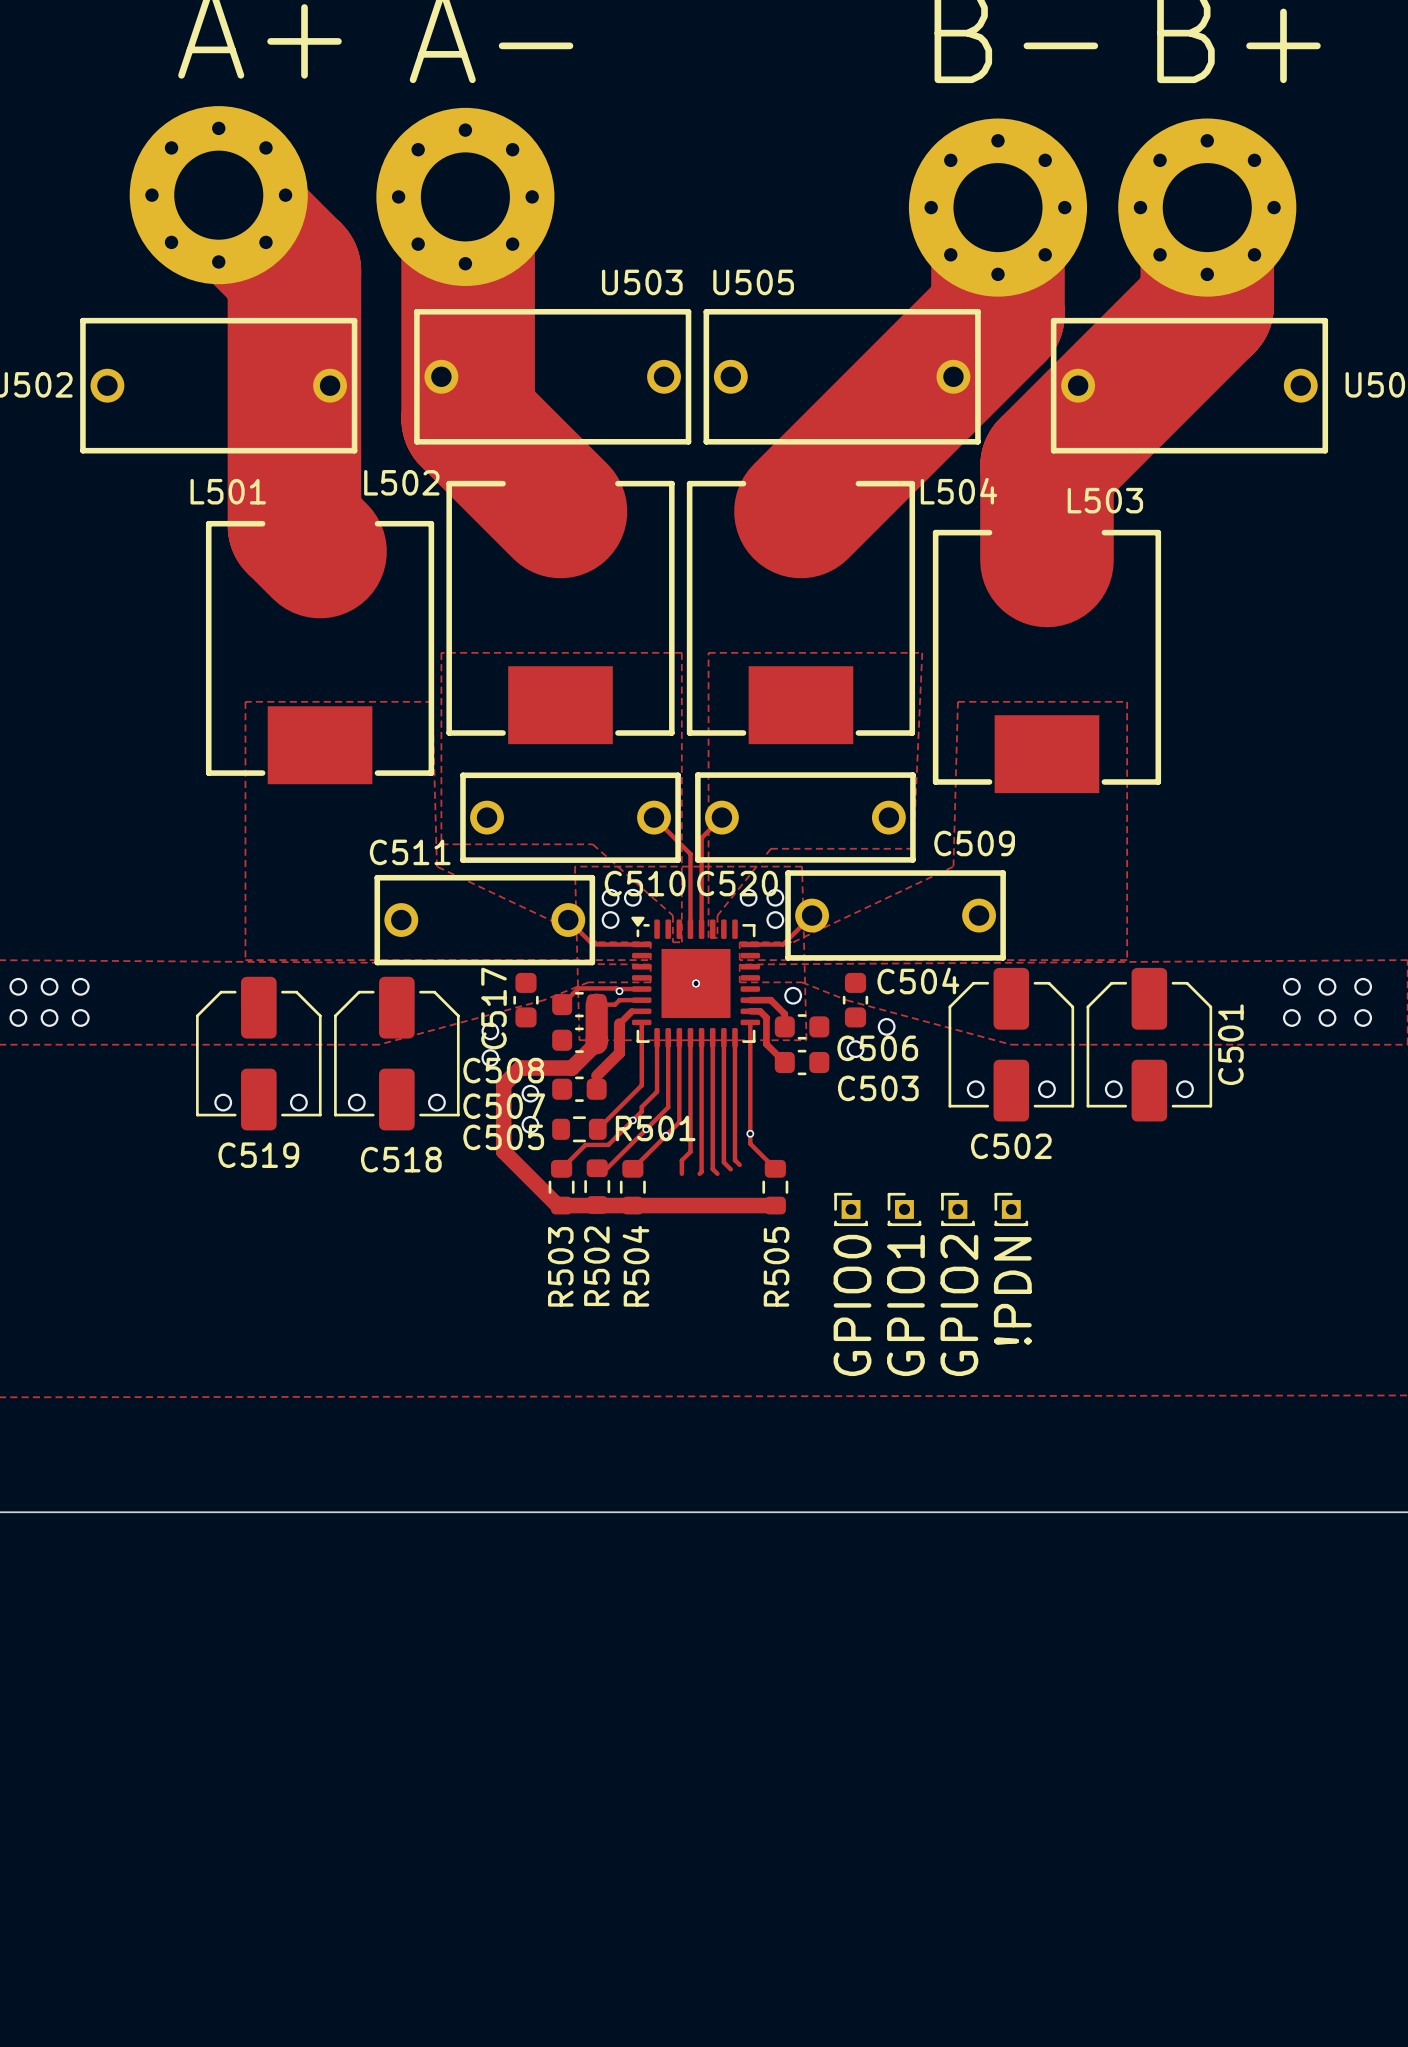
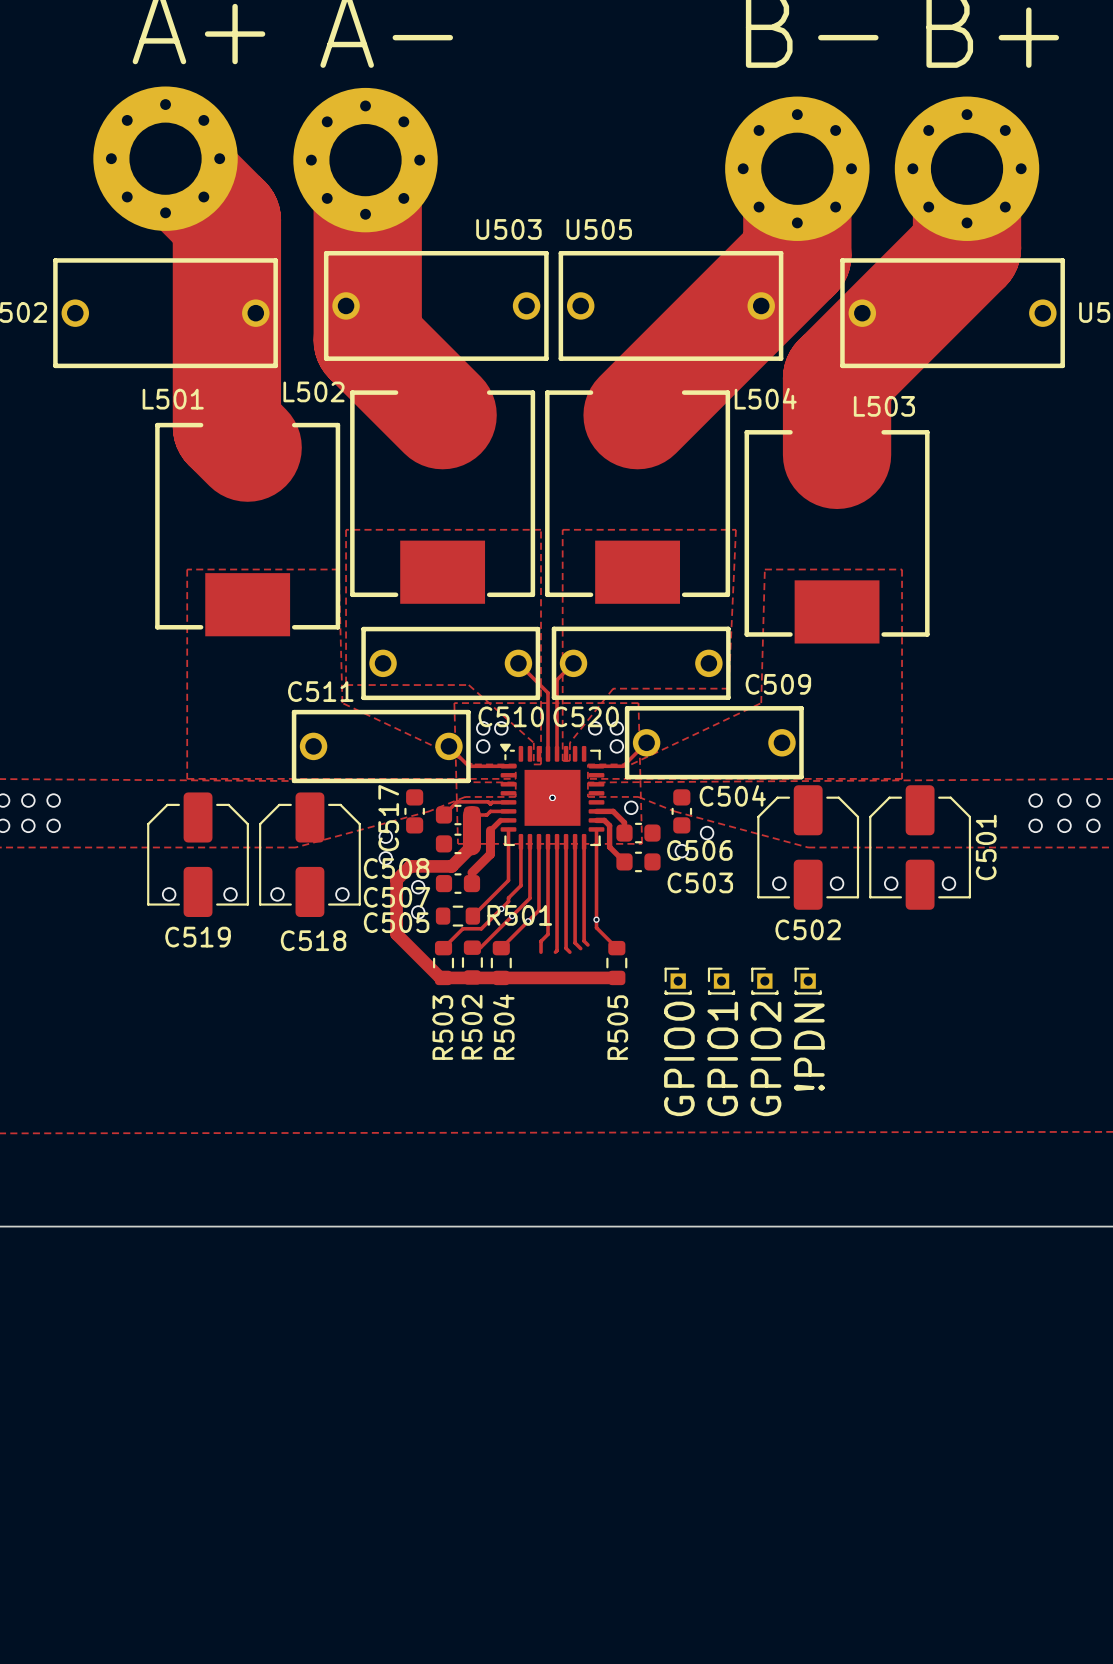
via: (619, 991) -> none

